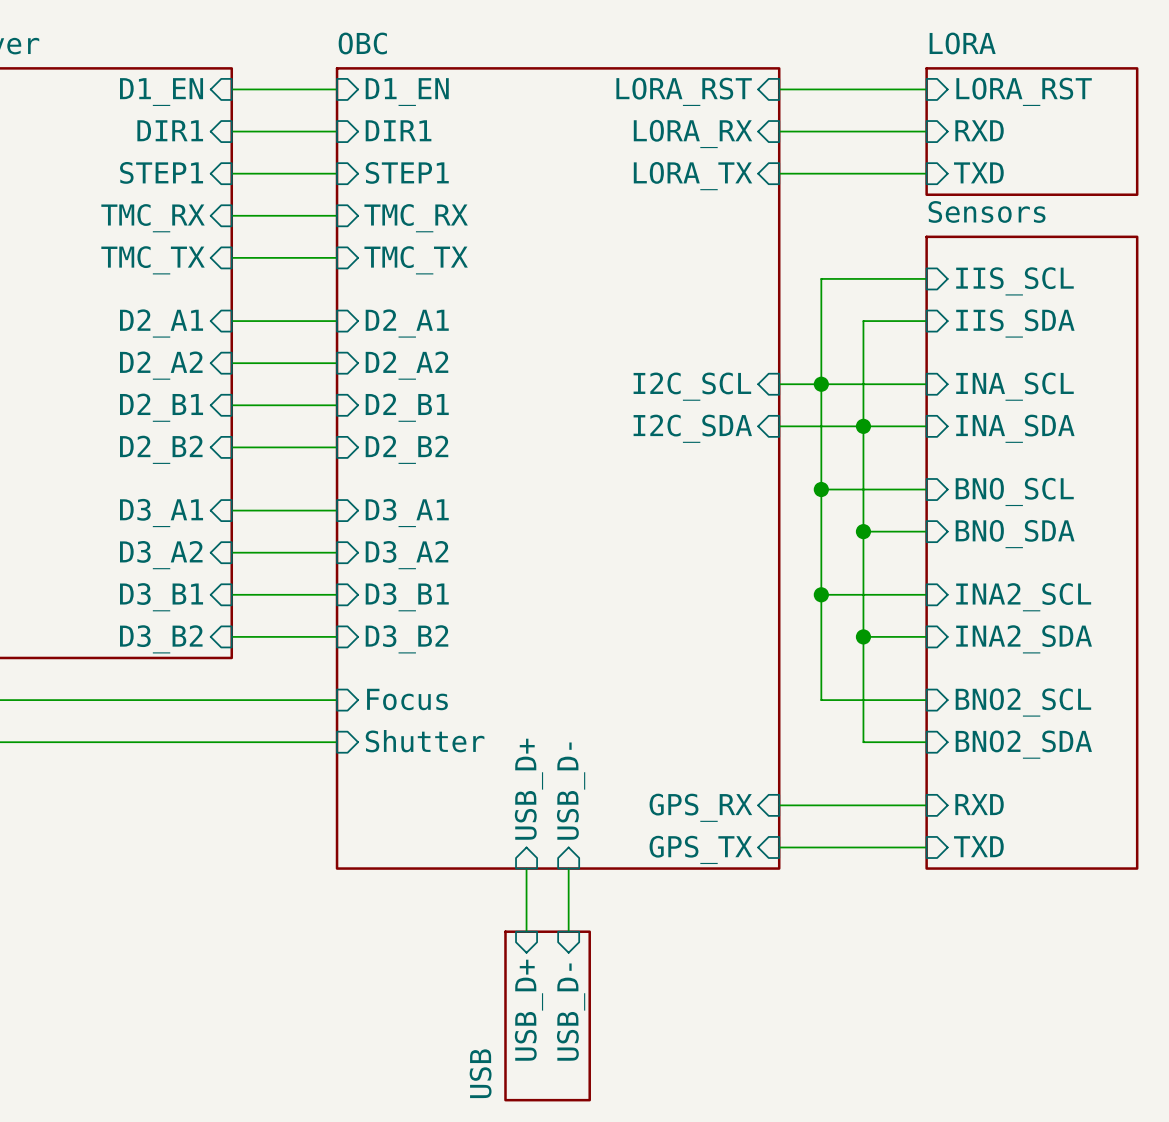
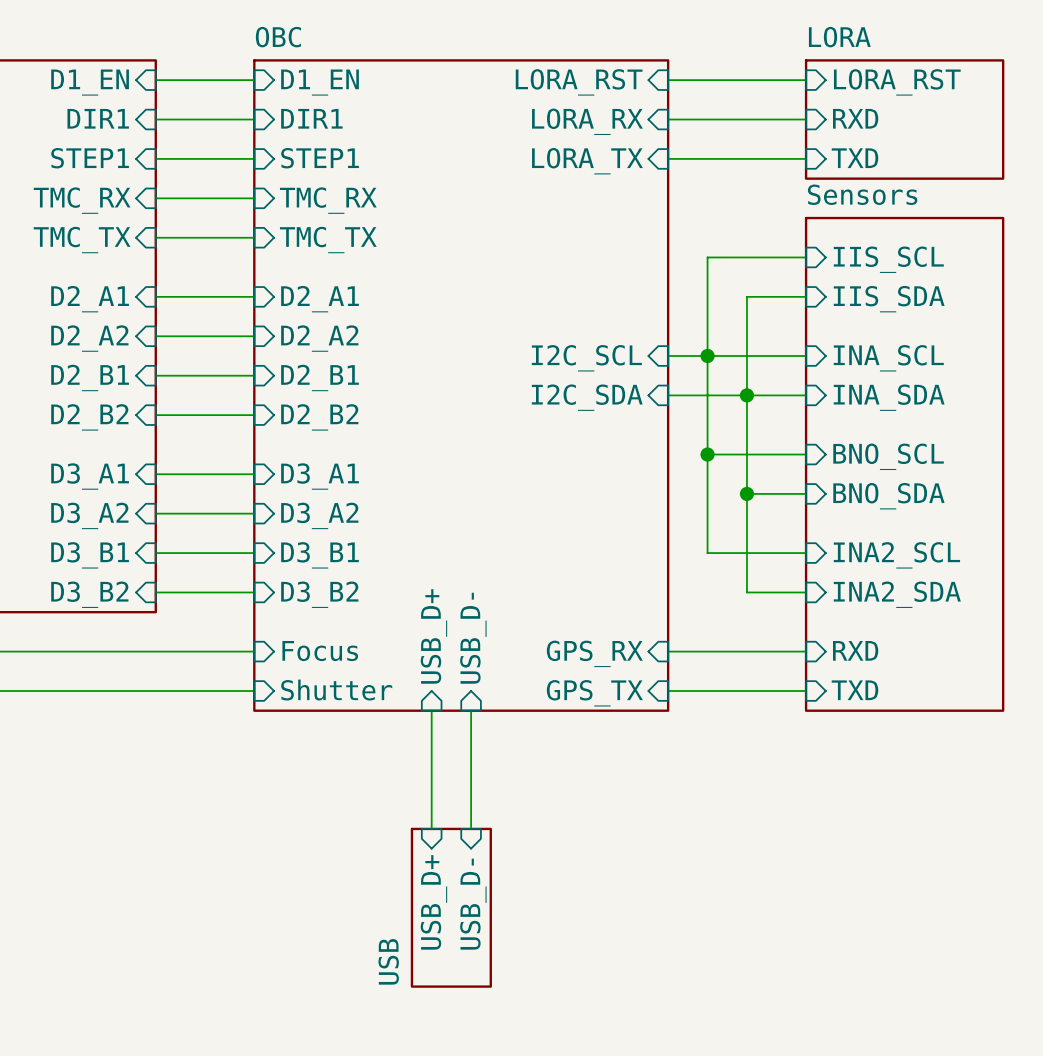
sheet OBC: none -> (461, 385)
sheet OBC: (558, 468) -> none
sheet Sensors: none -> (904, 464)
sheet Sensors: (1031, 552) -> none
wire: (821, 594) (821, 700) -> (668, 651) (707, 651)
junction: (821, 594) -> none
wire: (863, 636) (863, 742) -> (668, 691) (746, 691)
junction: (863, 636) -> none
sheet pin: none -> USB_D+ (433, 636)
sheet pin: none -> USB_D- (473, 638)
sheet pin: BNO2_SCL (1023, 702) -> RXD (855, 650)
sheet pin: BNO2_SDA (1023, 744) -> TXD (855, 690)
wire: none -> (431, 710) (431, 809)
wire: none -> (471, 710) (471, 809)
sheet pin: USB_D+ (528, 789) -> none
sheet pin: USB_D- (571, 791) -> none
sheet pin: RXD (979, 804) -> none
wire: (779, 805) (926, 805) -> none
sheet pin position: GPS_RX (700, 807) -> GPS_RX (594, 653)
sheet pin: TXD (978, 846) -> none
wire: (779, 847) (926, 847) -> none
sheet pin position: GPS_TX (700, 849) -> GPS_TX (594, 693)
wire: (526, 889) (526, 931) -> none
wire: (568, 889) (568, 931) -> none
sheet pin: none -> USB_D+ (433, 902)
sheet pin: none -> USB_D- (473, 904)
sheet pin: USB_D+ (528, 1010) -> none
sheet pin: USB_D- (571, 1012) -> none
sheet USB position: (547, 1015) -> (451, 907)

